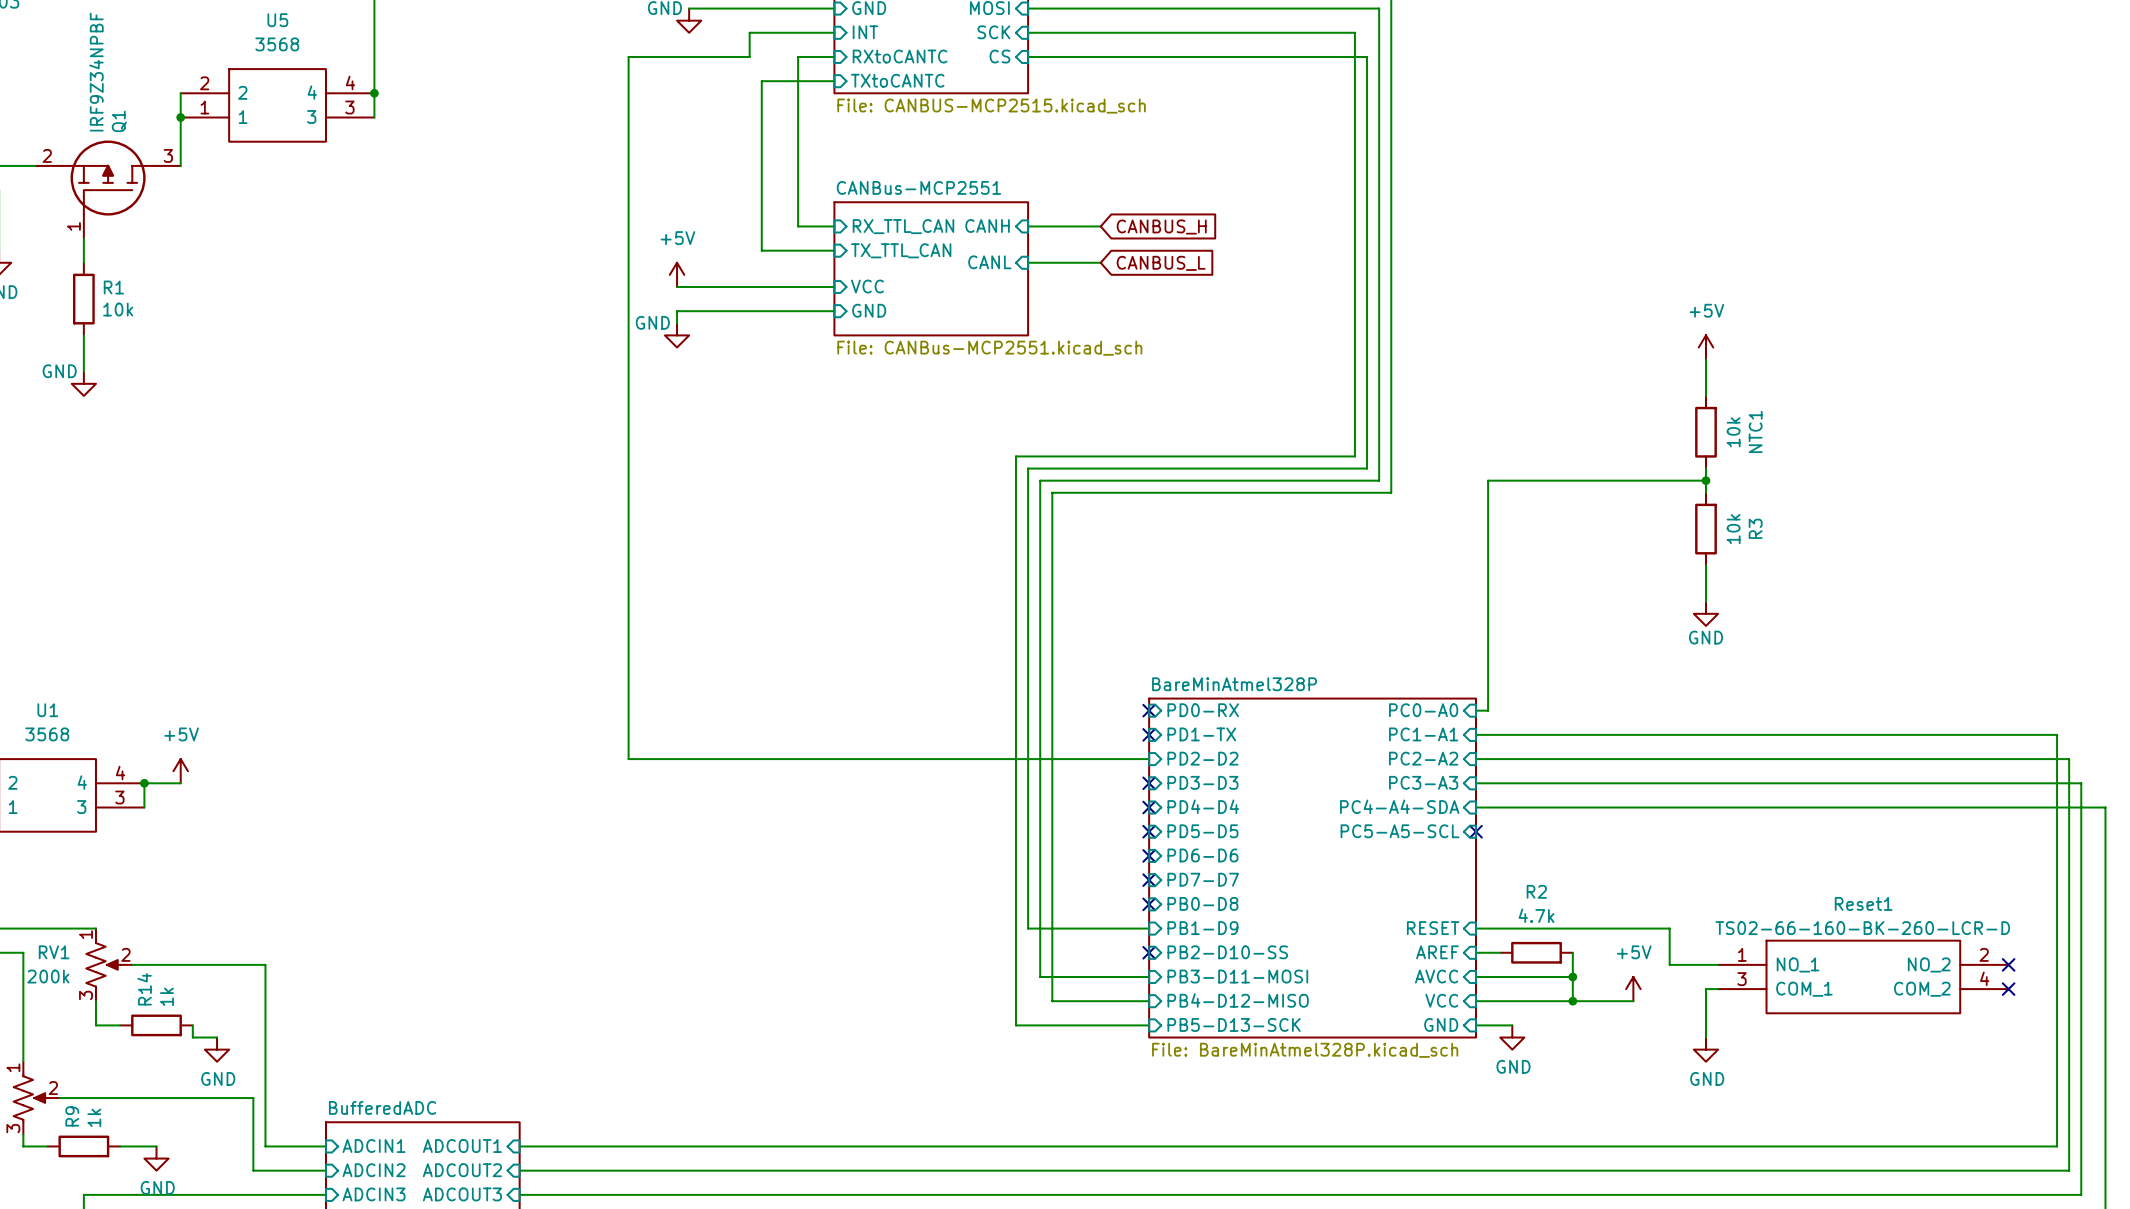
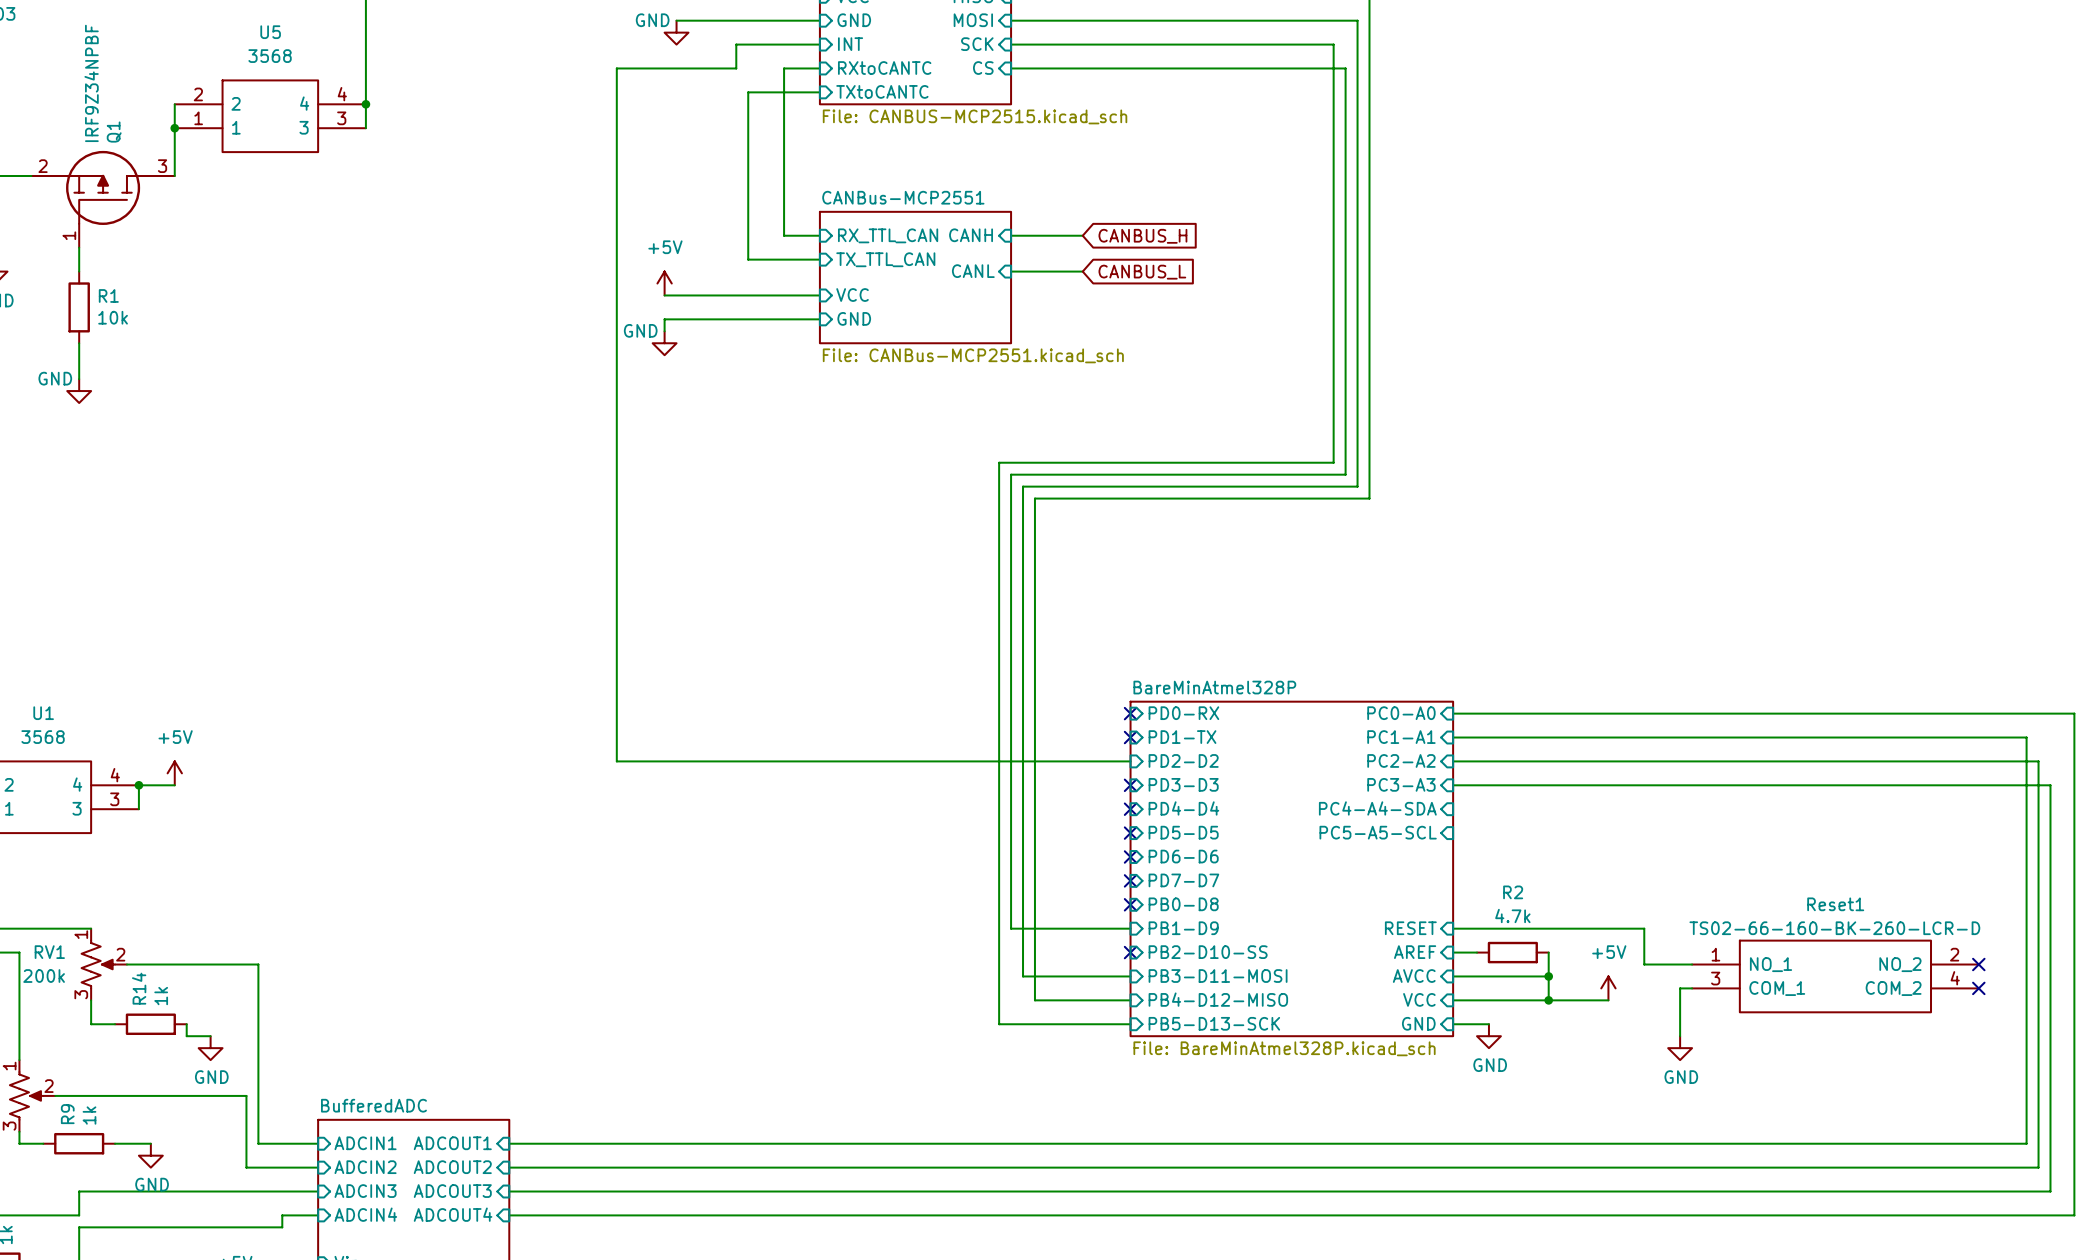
power symbol: +5V (1705, 347) -> none
wire: (1705, 359) (1705, 395) -> none
NTC1: 10k (1705, 432) -> none
wire: (1705, 468) (1705, 492) -> none
wire: (1705, 480) (1488, 480) (1488, 710) -> none
junction: (1705, 480) -> none
R3: 10k (1705, 529) -> none
wire: (1705, 565) (1705, 601) -> none
power symbol: GND (1705, 613) -> none
wire: (1475, 807) (2105, 807) -> (1465, 713) (2074, 713) (2074, 809)
no-connect mark: (1475, 831) -> none

